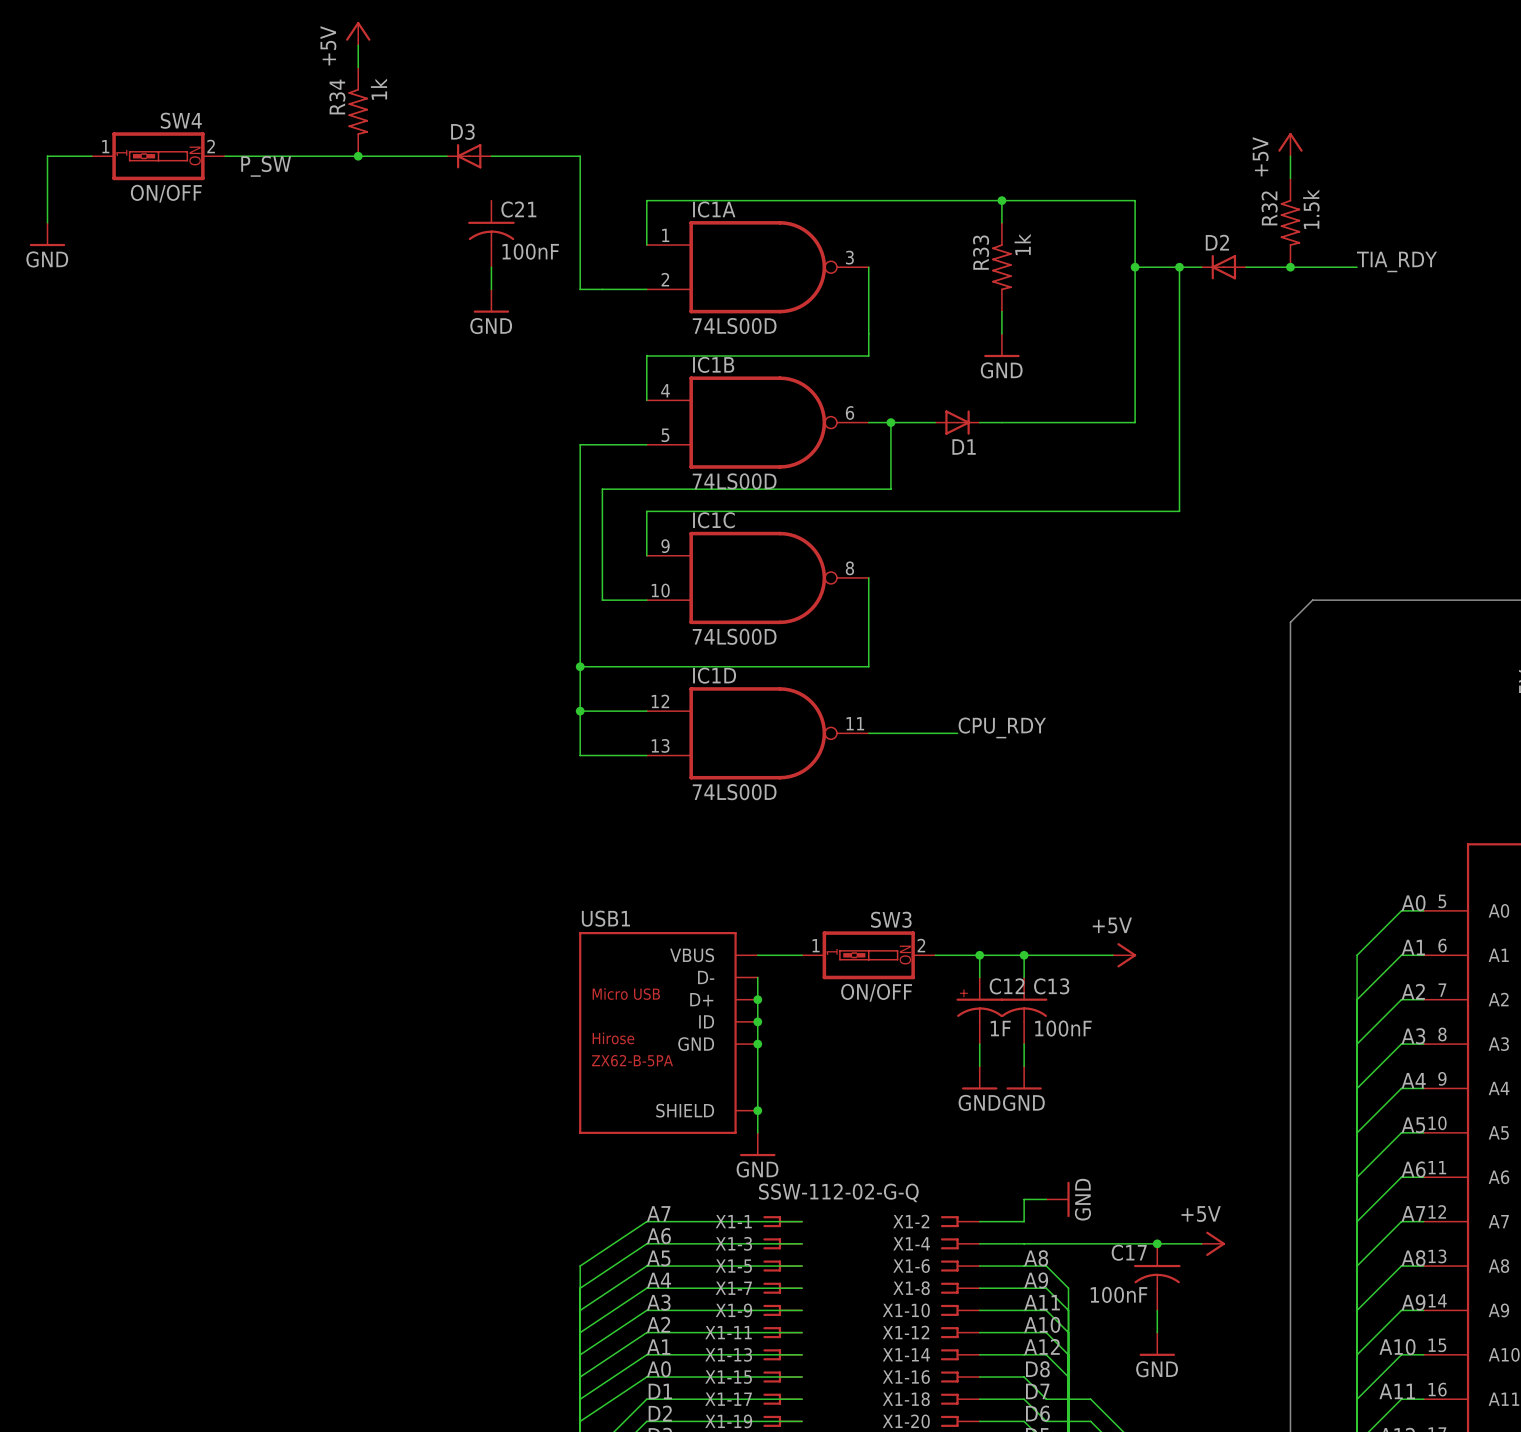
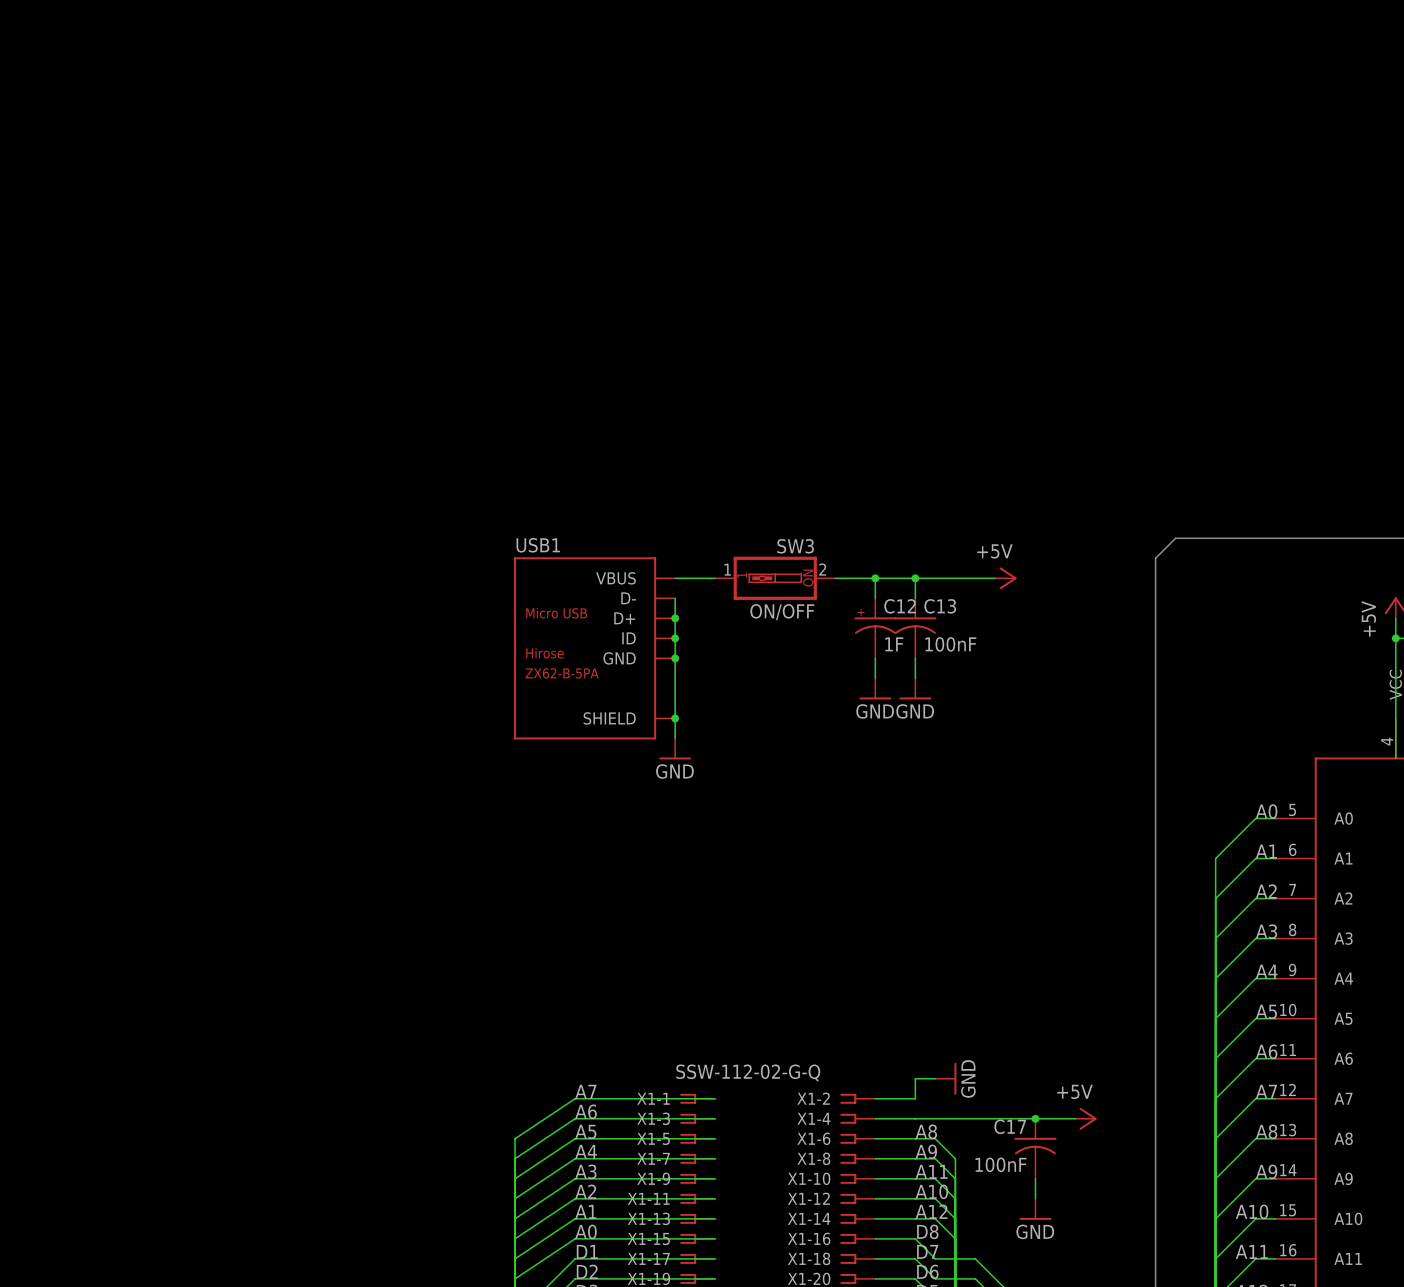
power symbol: +5V (358, 33) -> none
wire: (358, 45) (358, 67) -> none
R34: 1k (358, 111) -> none
power symbol: +5V (1290, 144) -> none
wire: (91, 156) (47, 156) (47, 222) -> none
SW4: ON/OFF (158, 156) -> none
wire: (225, 156) (447, 156) -> none
junction: (358, 156) -> none
D3: (469, 156) -> none
wire: (491, 156) (580, 156) (580, 289) (646, 289) -> none
wire: (1290, 156) (1290, 178) -> none
label: P_SW (266, 166) -> none
wire: (1001, 200) (1001, 222) -> none
junction: (1001, 200) -> none
R32: 1.5k (1290, 222) -> none
C21: 100nF (491, 233) -> none
power symbol: GND (47, 234) -> none
wire: (646, 245) (646, 200) (1135, 200) (1135, 422) (979, 422) -> none
label: TIA_RDY (1397, 261) -> none
wire: (491, 267) (491, 289) -> none
IC1A: 74LS00D (757, 267) -> none
wire: (868, 267) (868, 356) (646, 356) (646, 400) -> none
R33: 1k (1001, 267) -> none
wire: (1135, 267) (1201, 267) -> none
junction: (1135, 267) -> none
wire: (1179, 267) (1179, 511) (646, 511) (646, 555) -> none
junction: (1179, 267) -> none
D2: (1223, 267) -> none
wire: (1246, 267) (1357, 267) -> none
junction: (1290, 267) -> none
power symbol: GND (491, 301) -> none
wire: (1001, 311) (1001, 333) -> none
power symbol: GND (1001, 345) -> none
IC1B: 74LS00D (757, 422) -> none
wire: (868, 422) (935, 422) -> none
wire: (890, 422) (890, 489) (602, 489) (602, 600) (646, 600) -> none
junction: (890, 422) -> none
D1: (957, 422) -> none
wire: (646, 444) (580, 444) (580, 755) (646, 755) -> none
IC1C: 74LS00D (757, 577) -> none
wire: (868, 577) (868, 666) (580, 666) -> none
wire: none -> (675, 578) (715, 578)
wire: none -> (835, 578) (995, 578)
wire: none -> (875, 578) (875, 598)
junction: none -> (875, 578)
wire: none -> (915, 578) (915, 598)
junction: none -> (915, 578)
power symbol: none -> +5V (1005, 578)
junction: (580, 666) -> none
wire: none -> (675, 598) (675, 738)
junction: none -> (675, 618)
wire: (580, 711) (646, 711) -> none
junction: (580, 711) -> none
junction: none -> (675, 638)
label: CPU_RDY (1002, 727) -> none
IC1D: 74LS00D (757, 733) -> none
junction: none -> (675, 658)
wire: (868, 733) (957, 733) -> none
wire: none -> (875, 658) (875, 678)
wire: none -> (915, 658) (915, 678)
power symbol: none -> GND (875, 688)
power symbol: none -> GND (915, 688)
junction: none -> (675, 718)
power symbol: none -> GND (675, 748)
wire: (757, 955) (802, 955) -> none
SW3 position: (868, 955) -> (775, 578)
wire: (935, 955) (1112, 955) -> none
wire: (979, 955) (979, 977) -> none
junction: (979, 955) -> none
wire: (1024, 955) (1024, 977) -> none
junction: (1024, 955) -> none
power symbol: +5V (1124, 955) -> none
wire: (757, 977) (757, 1132) -> none
junction: (757, 999) -> none
C12 position: (979, 1010) -> (875, 628)
C13 position: (1024, 1010) -> (915, 628)
junction: (757, 1021) -> none
USB1 position: (668, 1032) -> (594, 648)
junction: (757, 1044) -> none
wire: (979, 1044) (979, 1066) -> none
wire: (1024, 1044) (1024, 1066) -> none
power symbol: GND (979, 1077) -> none
power symbol: GND (1024, 1077) -> none
junction: (757, 1110) -> none
power symbol: GND (757, 1144) -> none

